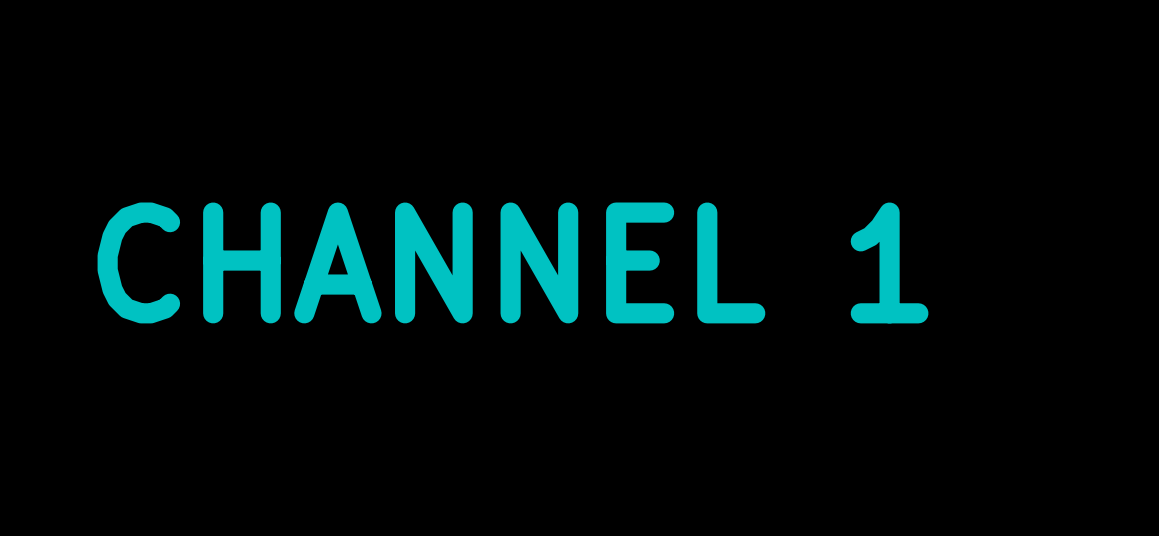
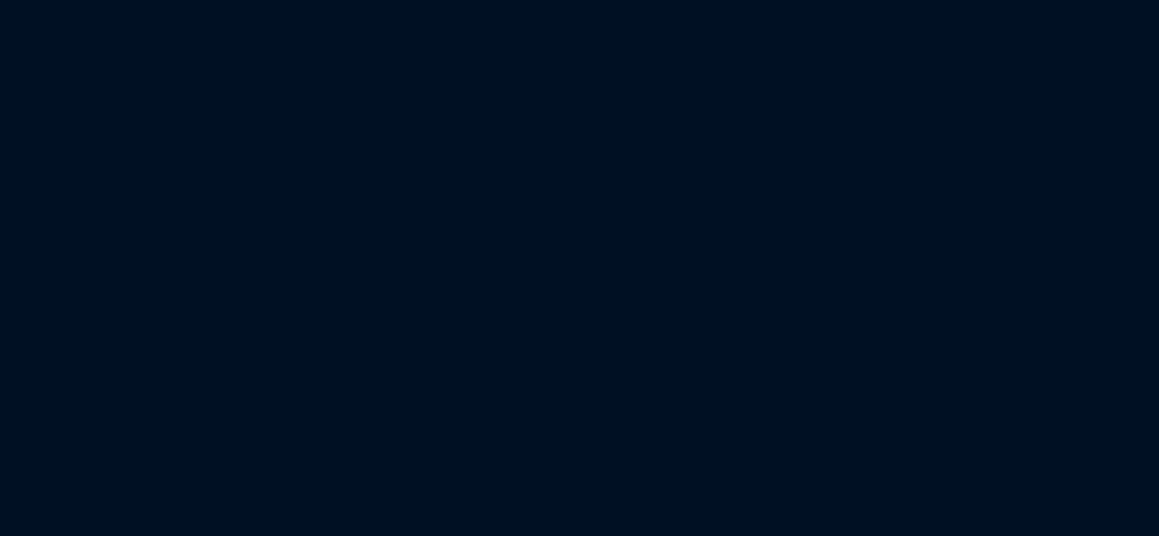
text: CHANNEL 1 (513, 262) -> none

